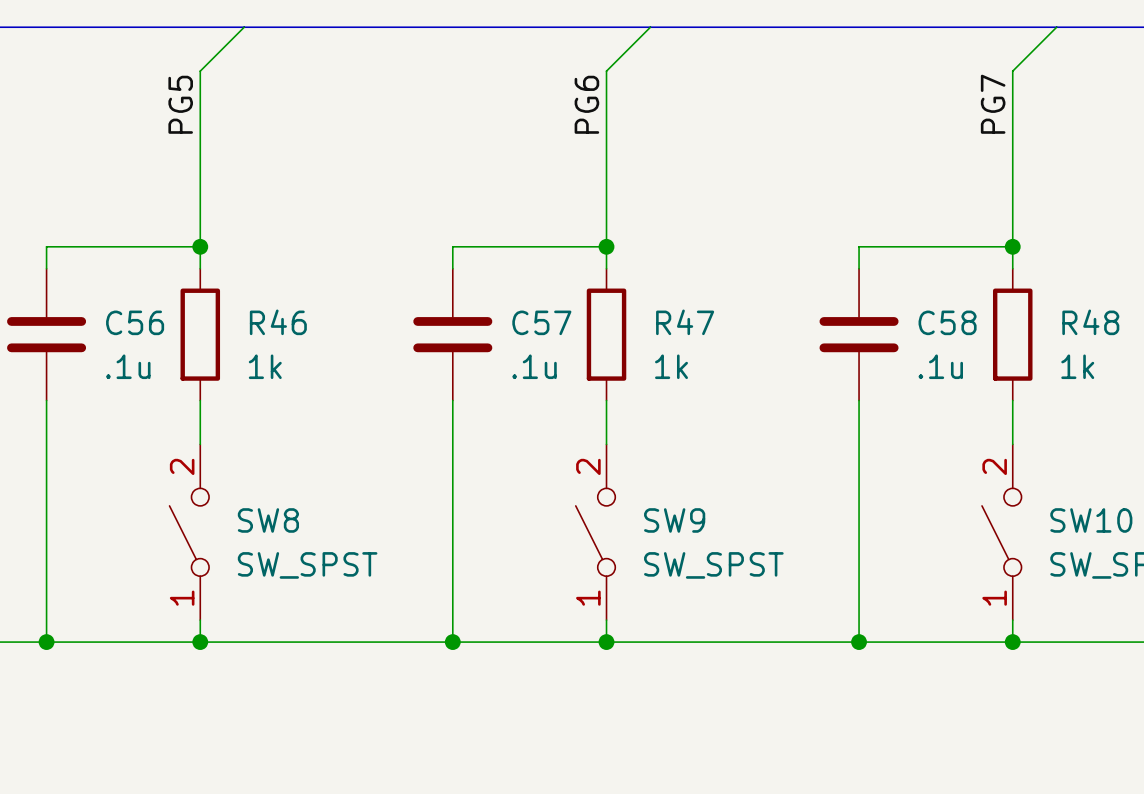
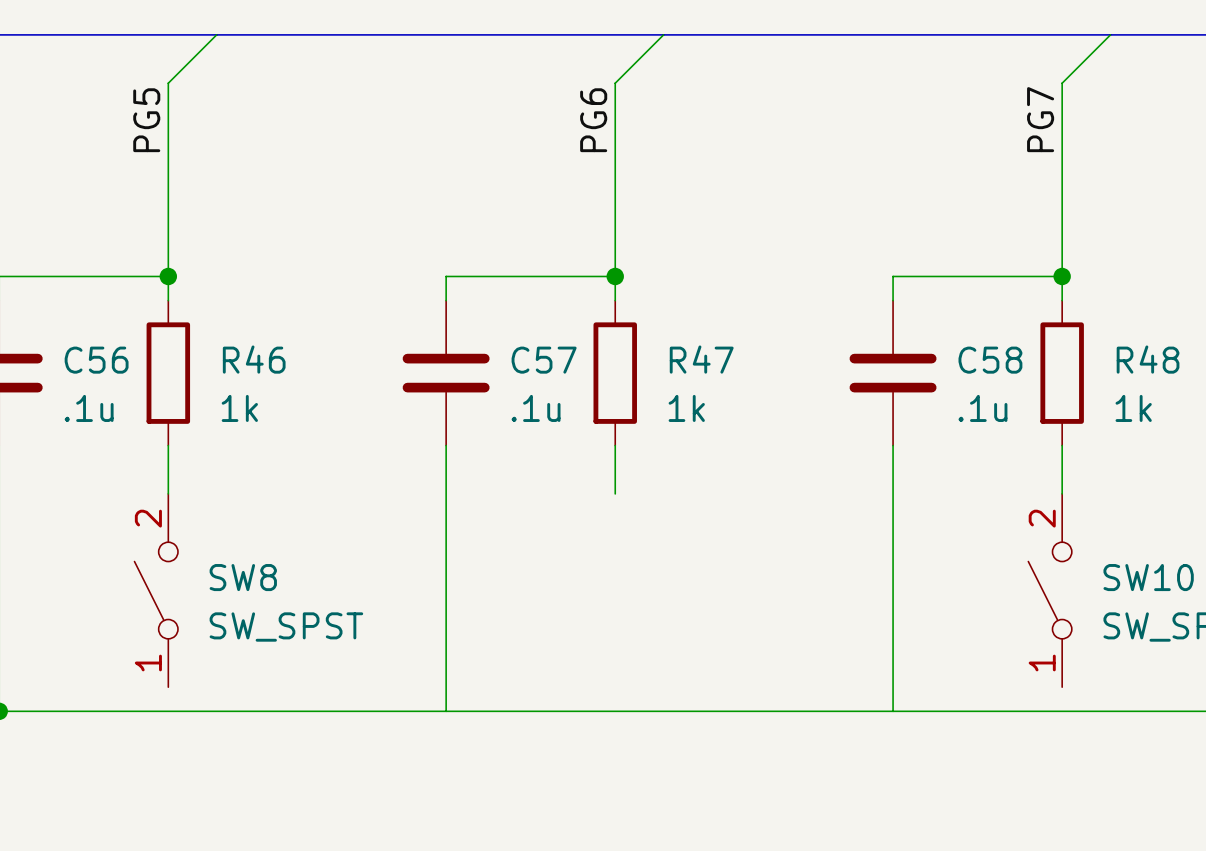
SW9: SW_SPST (595, 532) -> none
wire: (200, 620) (200, 642) -> none
wire: (606, 620) (606, 642) -> none
wire: (1012, 620) (1012, 642) -> none
junction: (200, 642) -> none
junction: (452, 642) -> none
junction: (606, 642) -> none
junction: (859, 642) -> none
junction: (1012, 642) -> none

